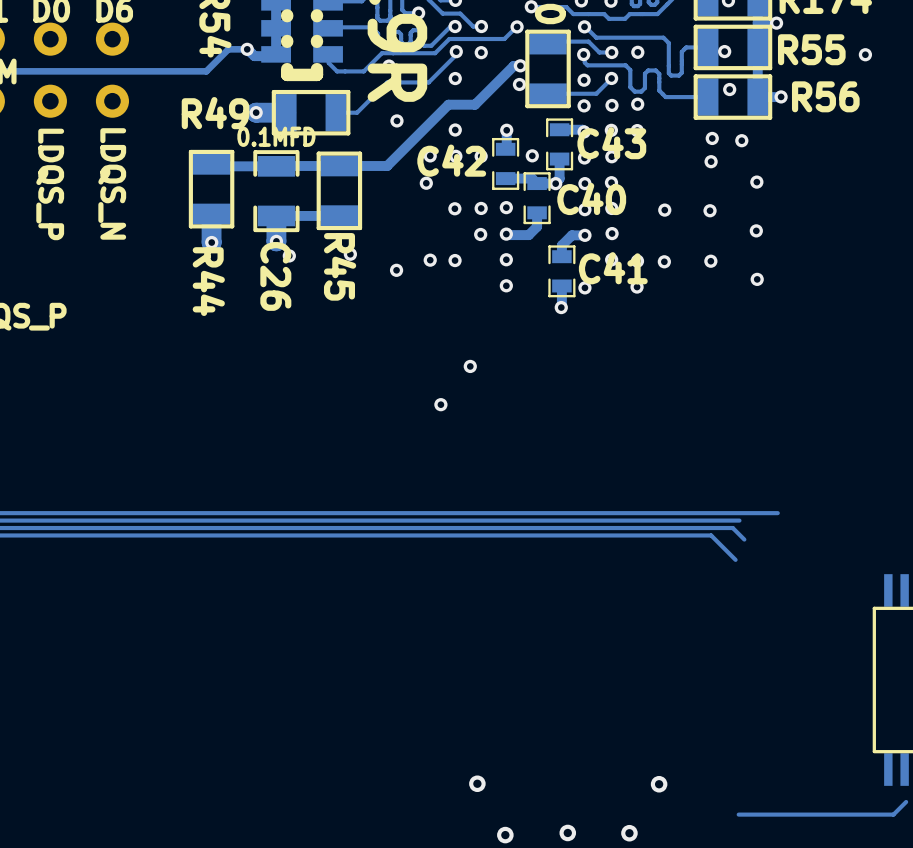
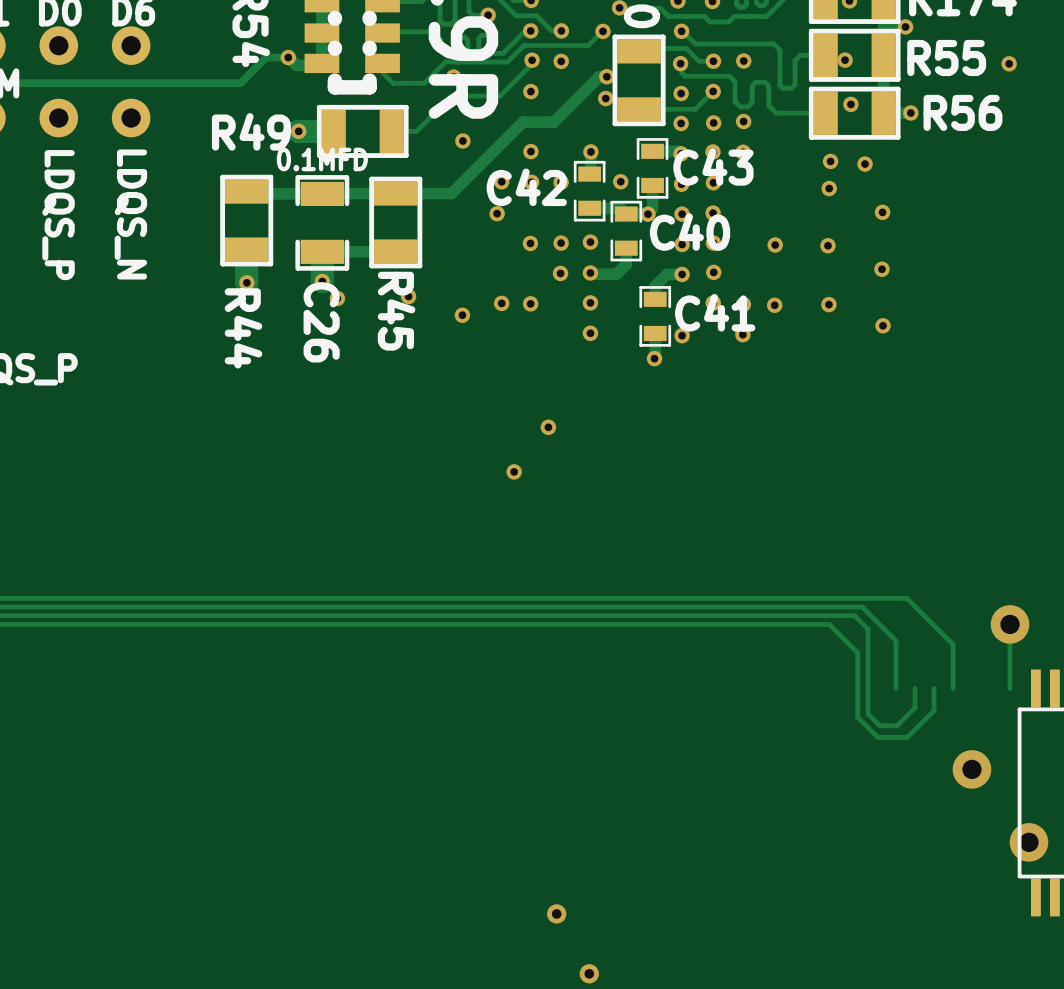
track: none -> (906, 598) (952, 644) (952, 688)
track: none -> (862, 607) (896, 640) (896, 688)
track: none -> (1009, 624) (1009, 688)
via: none -> (1010, 624)
track: none -> (868, 629) (868, 713) (879, 725) (897, 725) (915, 707) (915, 688)
track: none -> (857, 652) (857, 717) (877, 737) (907, 737) (934, 710) (934, 688)
via: none -> (971, 769)
via: none -> (1028, 842)
via: (659, 784) -> none
track: (906, 801) (893, 814) (738, 814) -> none
via: (567, 832) -> none
via: (629, 833) -> none

